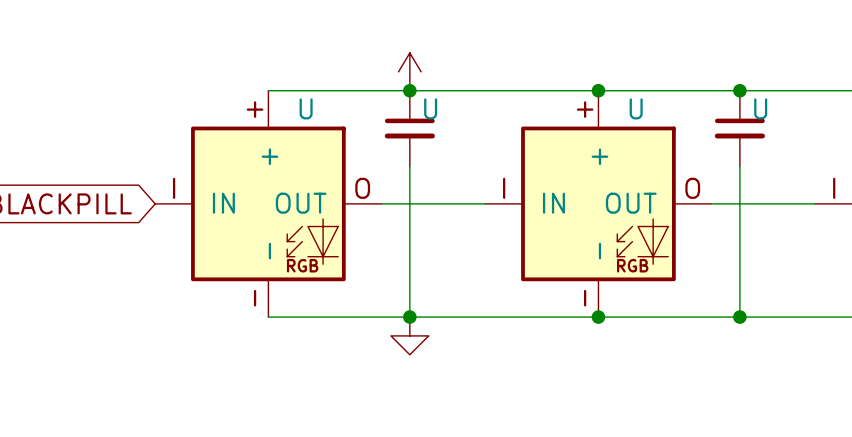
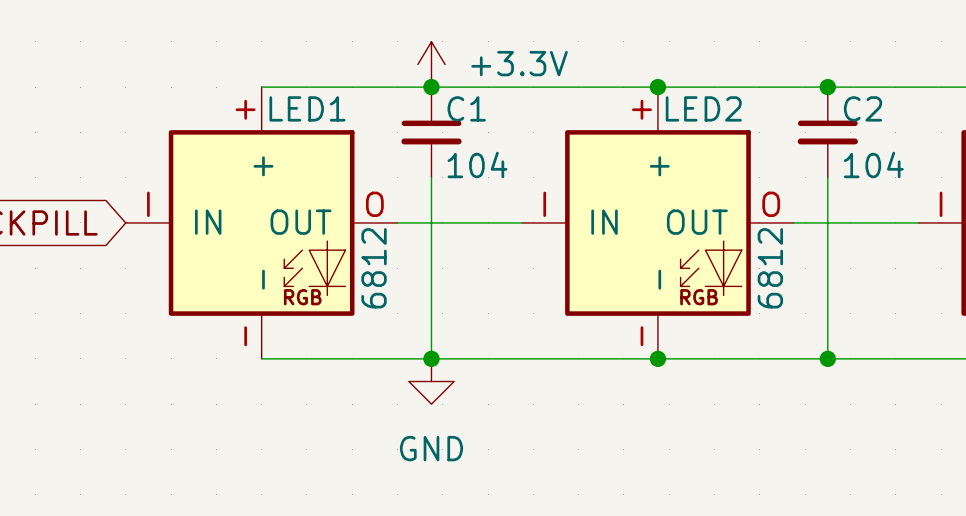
power symbol text: none -> +3.3V (519, 63)
U name: U (306, 108) -> LED1 (307, 108)
U name: U (430, 108) -> C1 (466, 108)
U name: U (636, 108) -> LED2 (703, 108)
U name: U (760, 108) -> C2 (863, 108)
U value: none -> 104 (477, 164)
U value: none -> 104 (873, 164)
U value: none -> 6812 (374, 268)
U value: none -> 6812 (770, 268)
power symbol text: none -> GND (431, 448)

